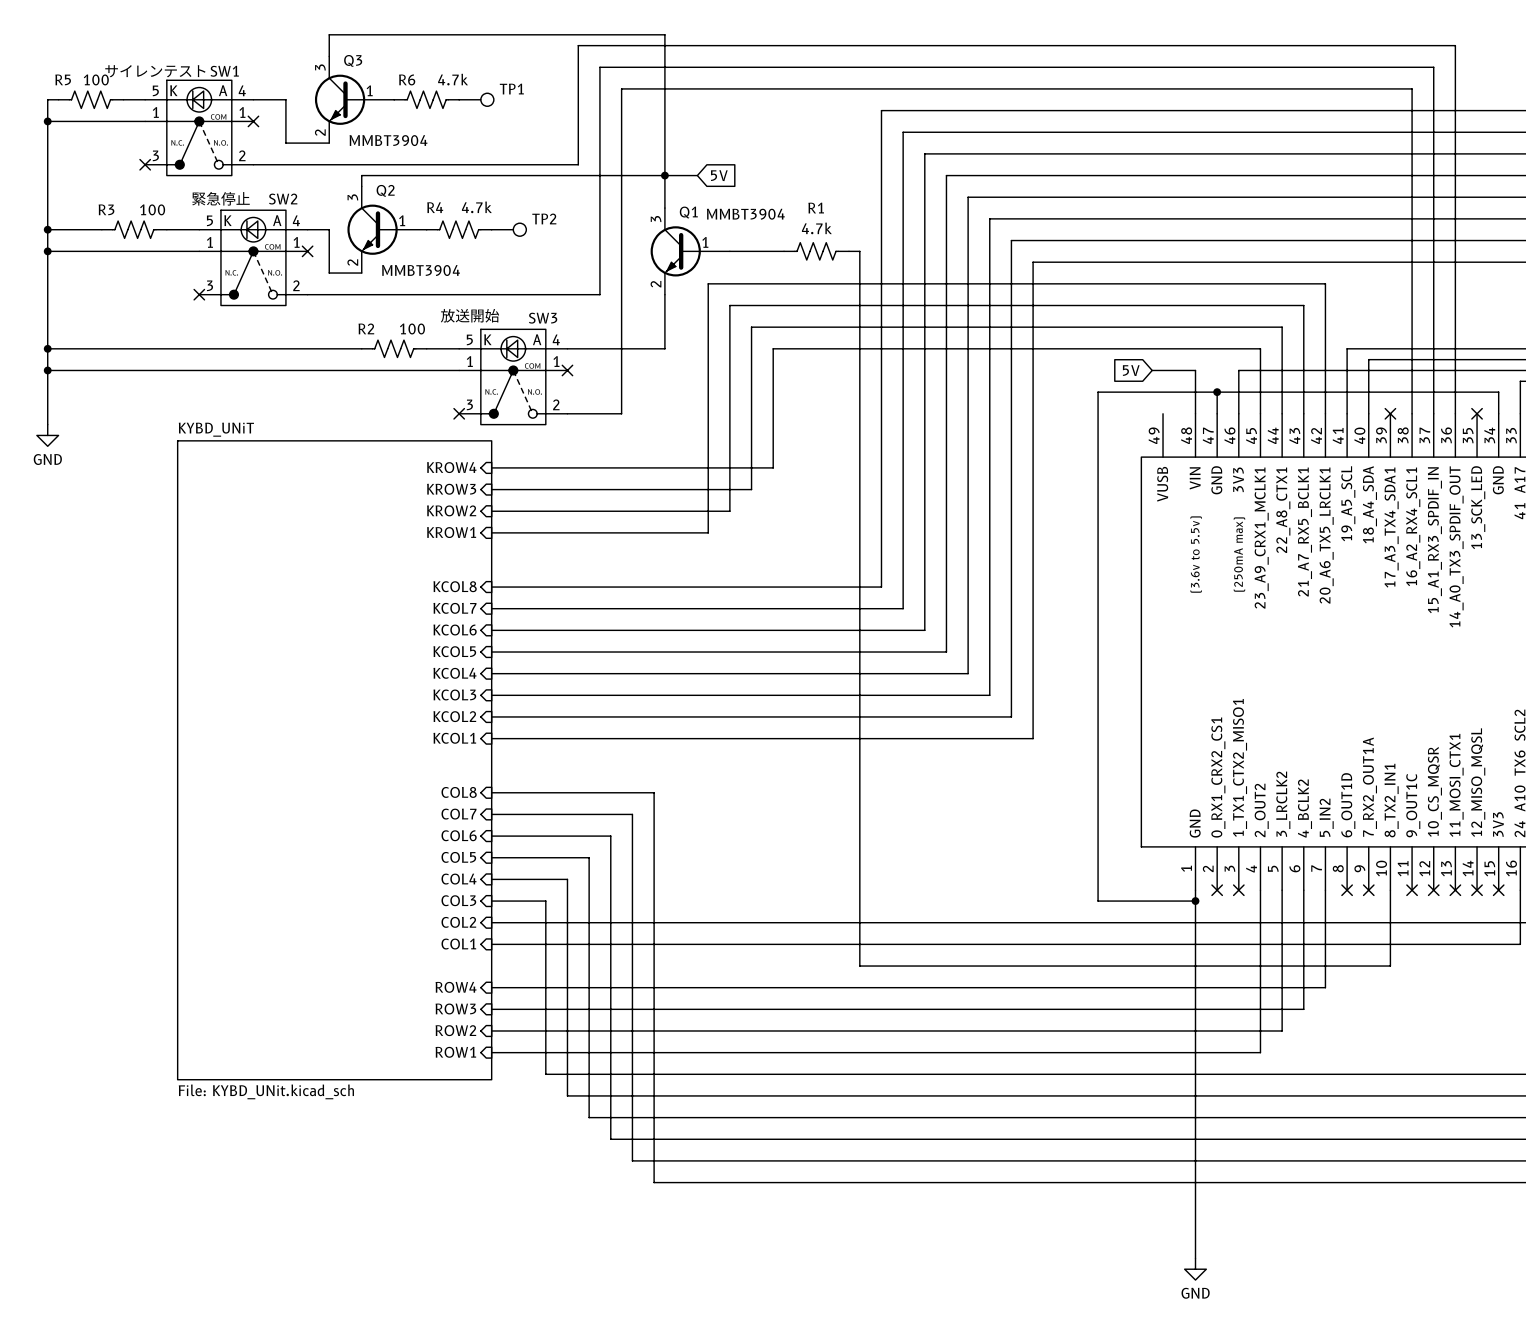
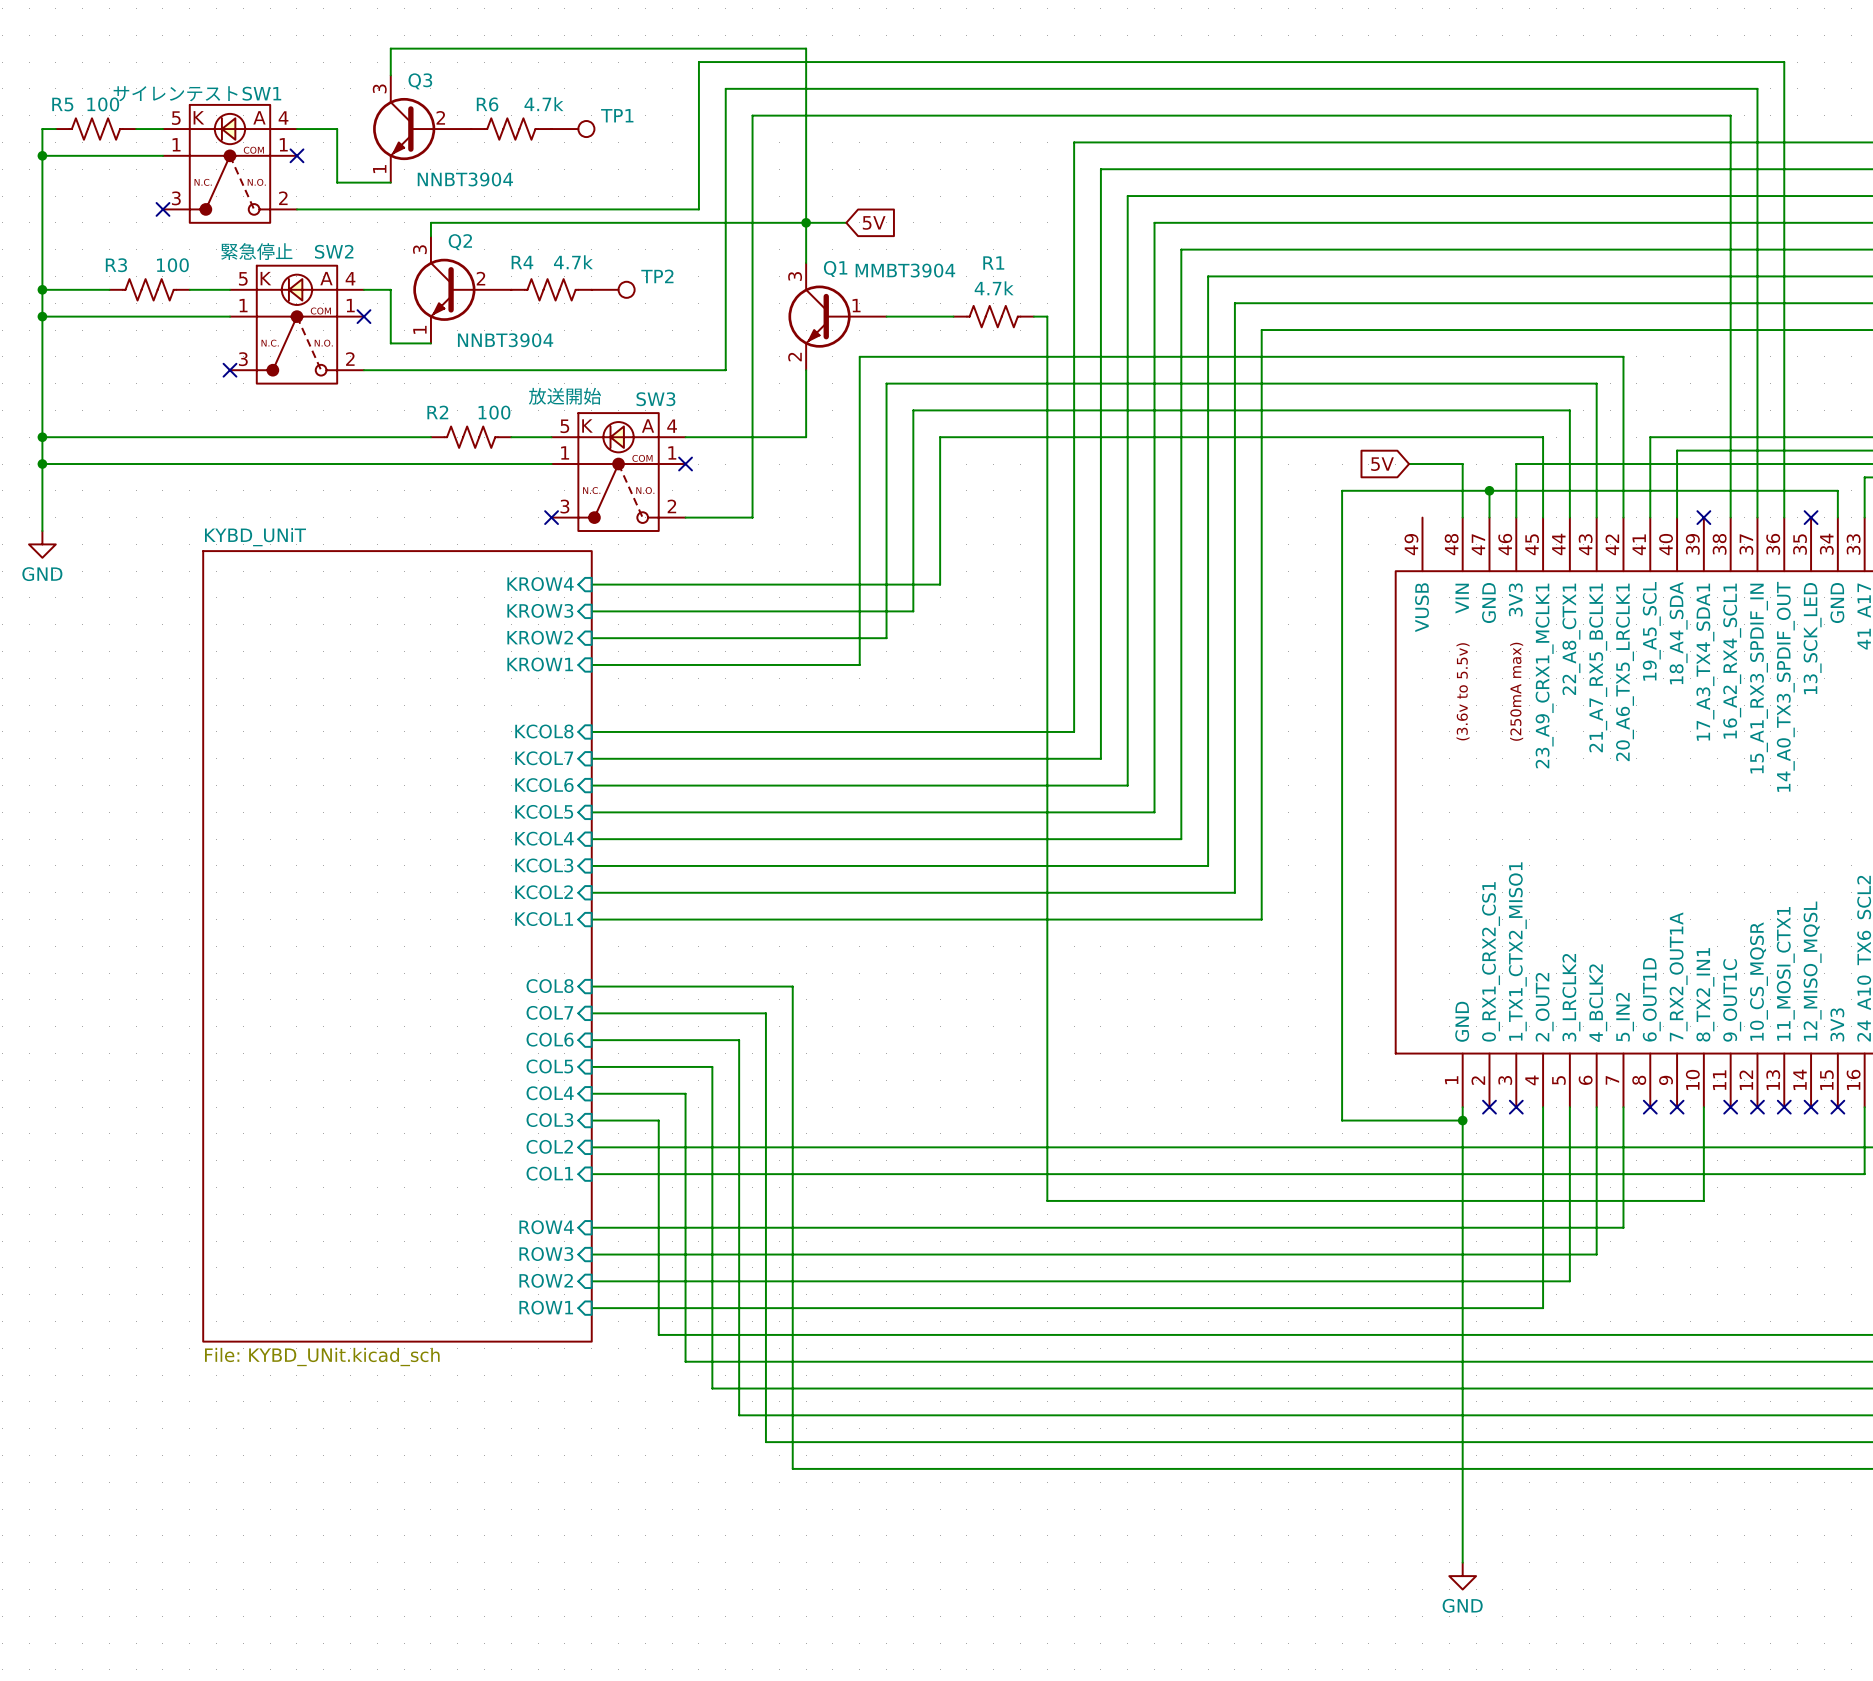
Q3 pin number: 1 (369, 90) -> 2 (440, 117)
Q3 pin number: 2 (320, 132) -> 1 (379, 169)
Q3 value: MMBT3904 (388, 140) -> NNBT3904 (465, 179)
Q2 pin number: 1 (402, 220) -> 2 (480, 278)
Q2 pin number: 2 (352, 262) -> 1 (419, 329)
Q2 value: MMBT3904 (421, 270) -> NNBT3904 (505, 340)

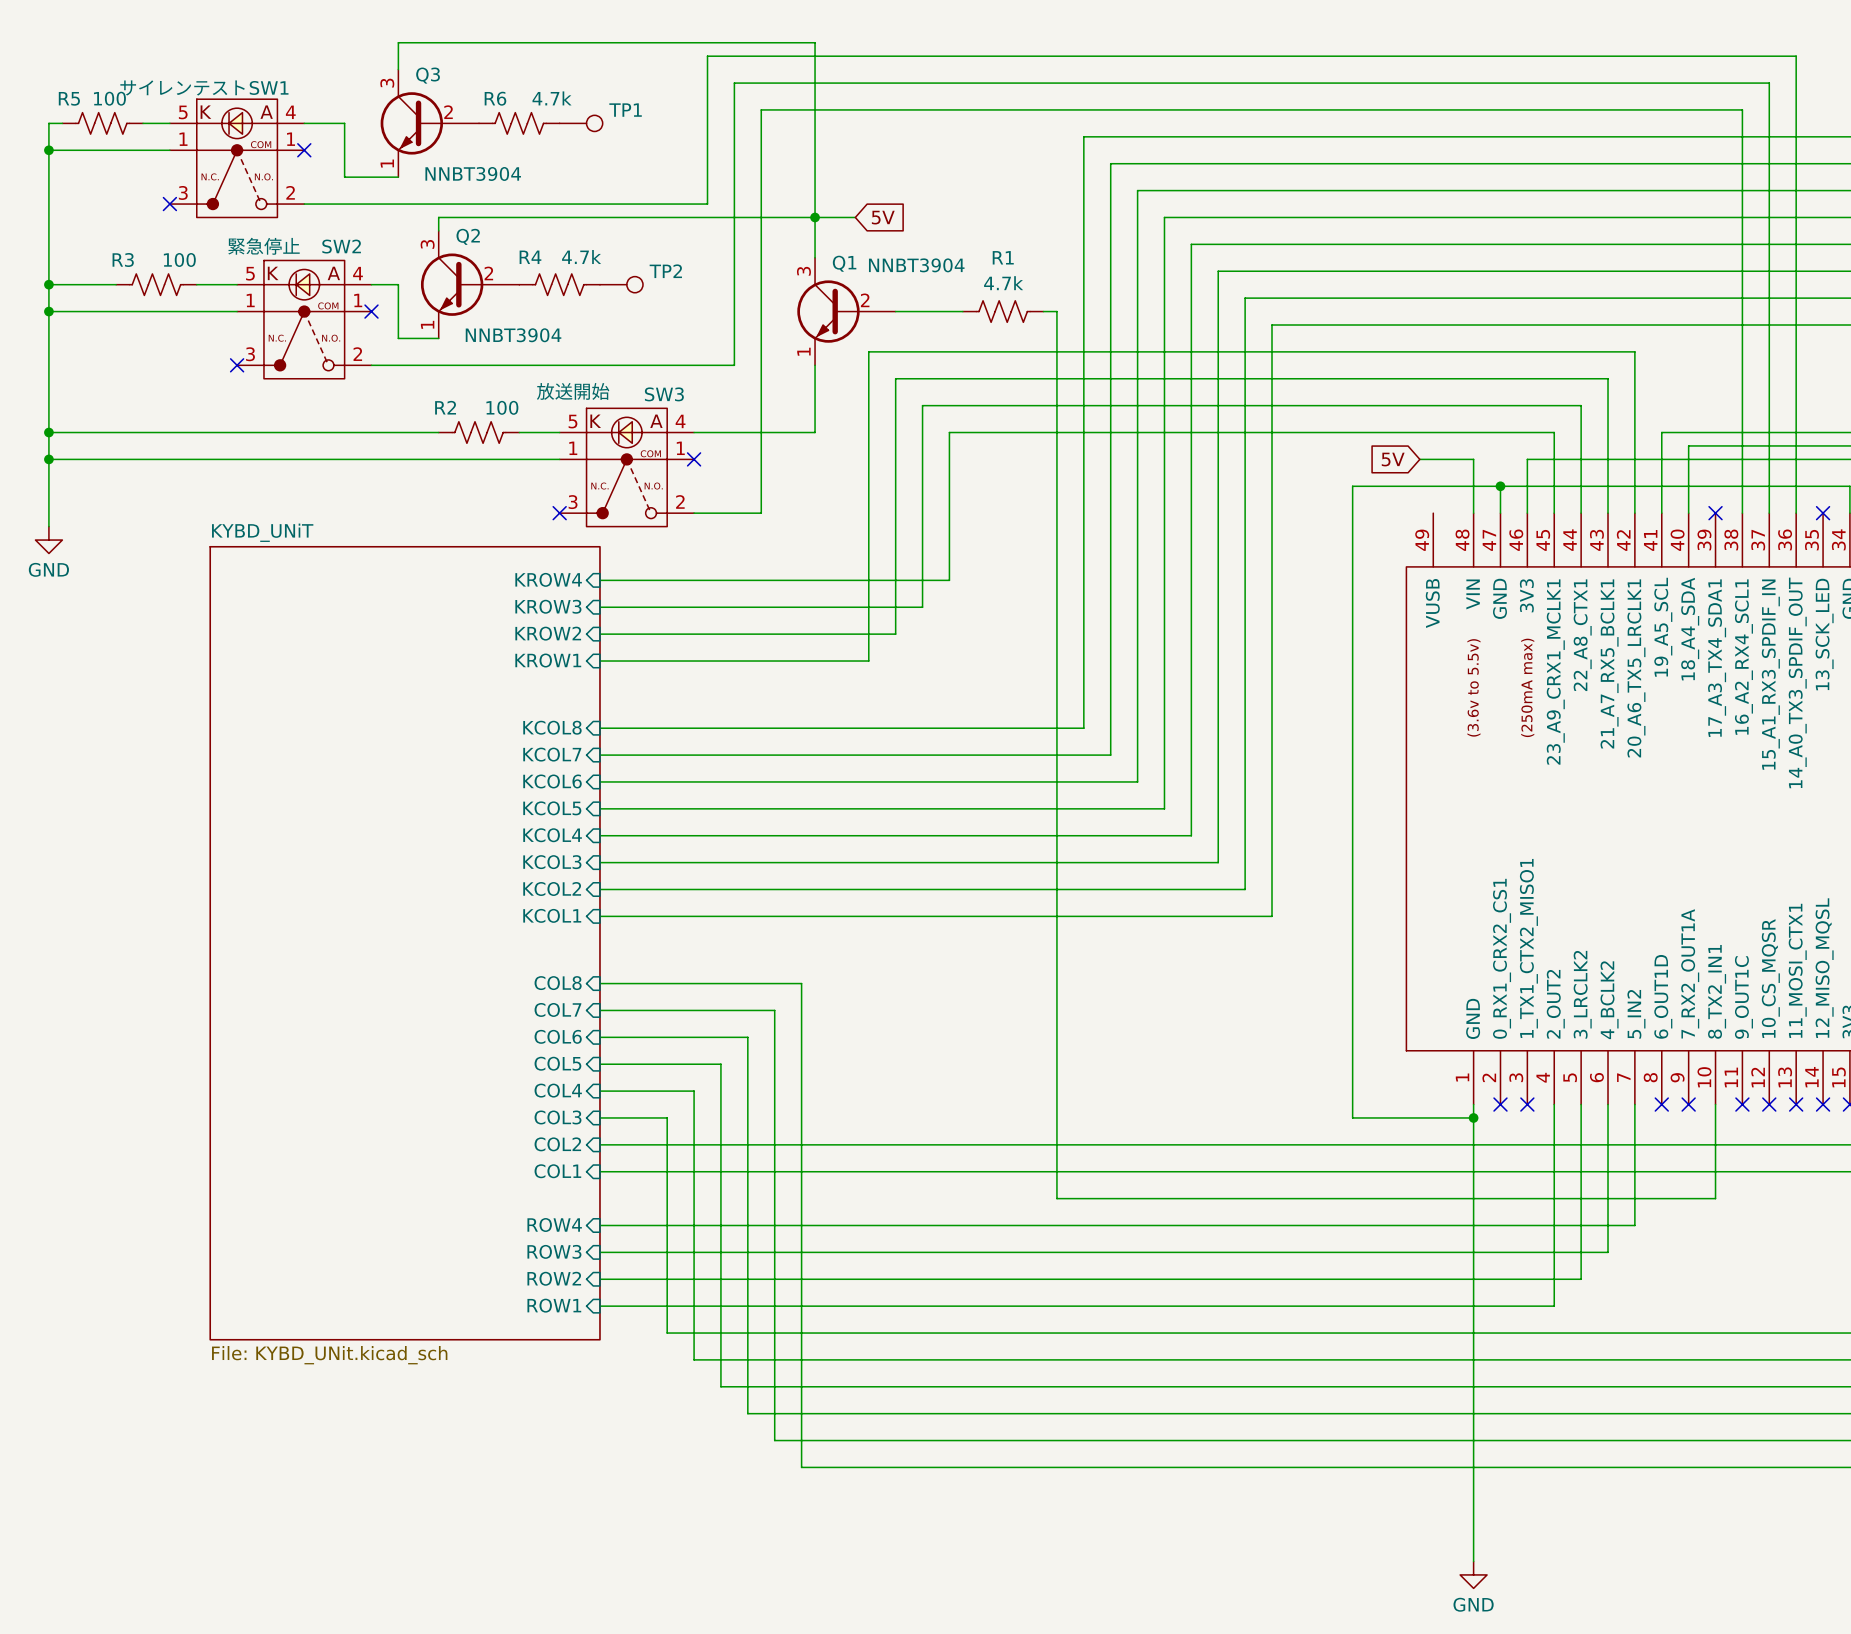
Q1 value: MMBT3904 (905, 270) -> NNBT3904 (916, 265)
Q1 pin number: 1 (856, 305) -> 2 (865, 300)
Q1 pin number: 2 (794, 357) -> 1 (803, 351)

